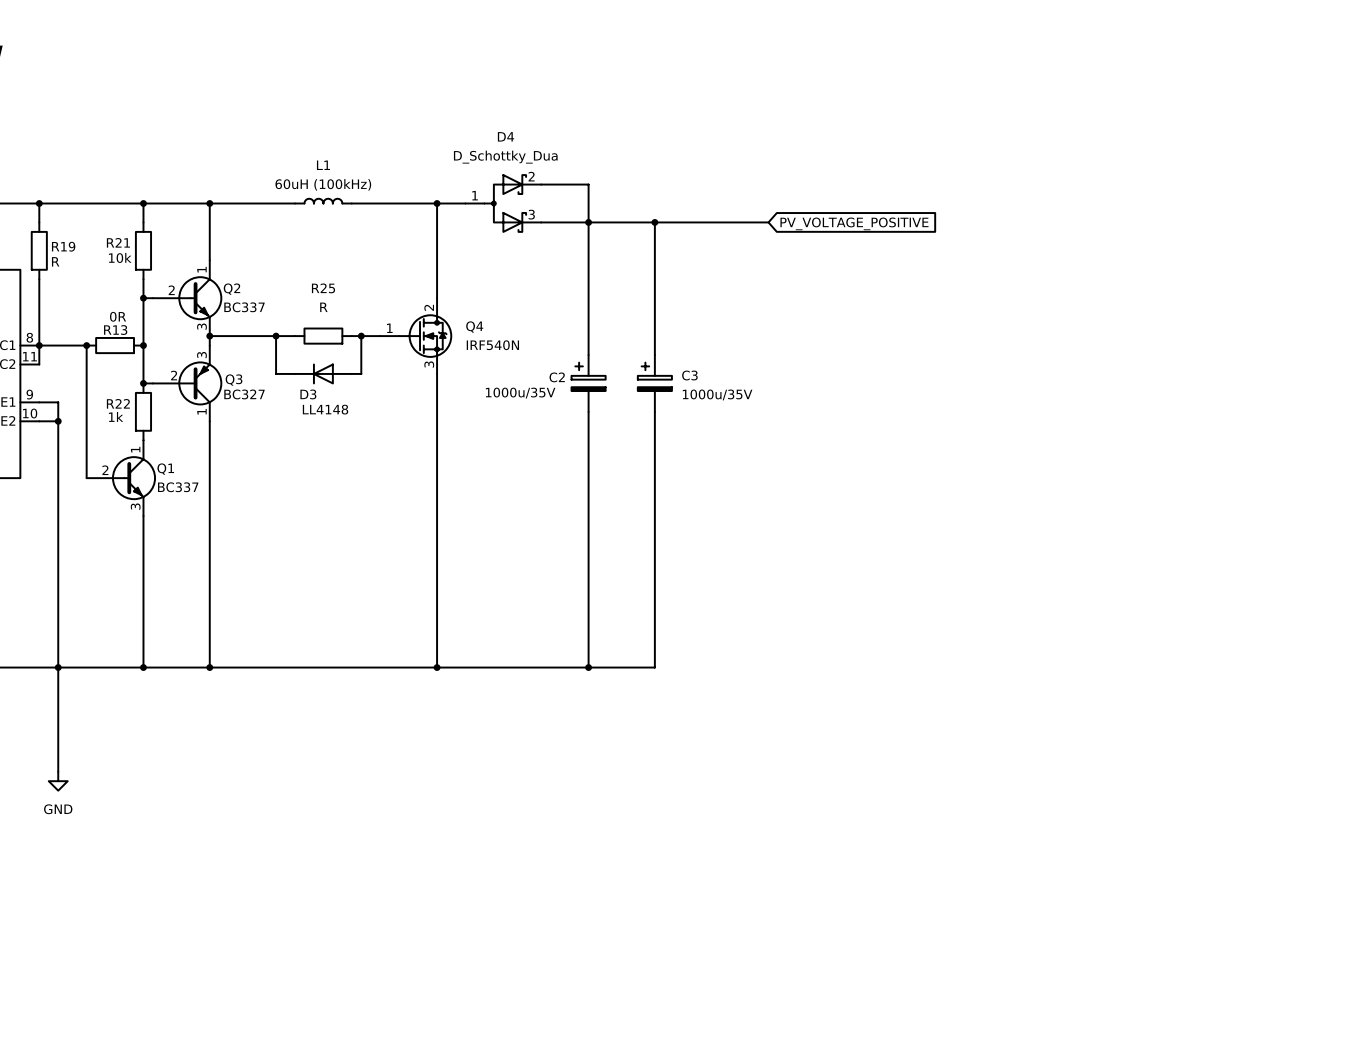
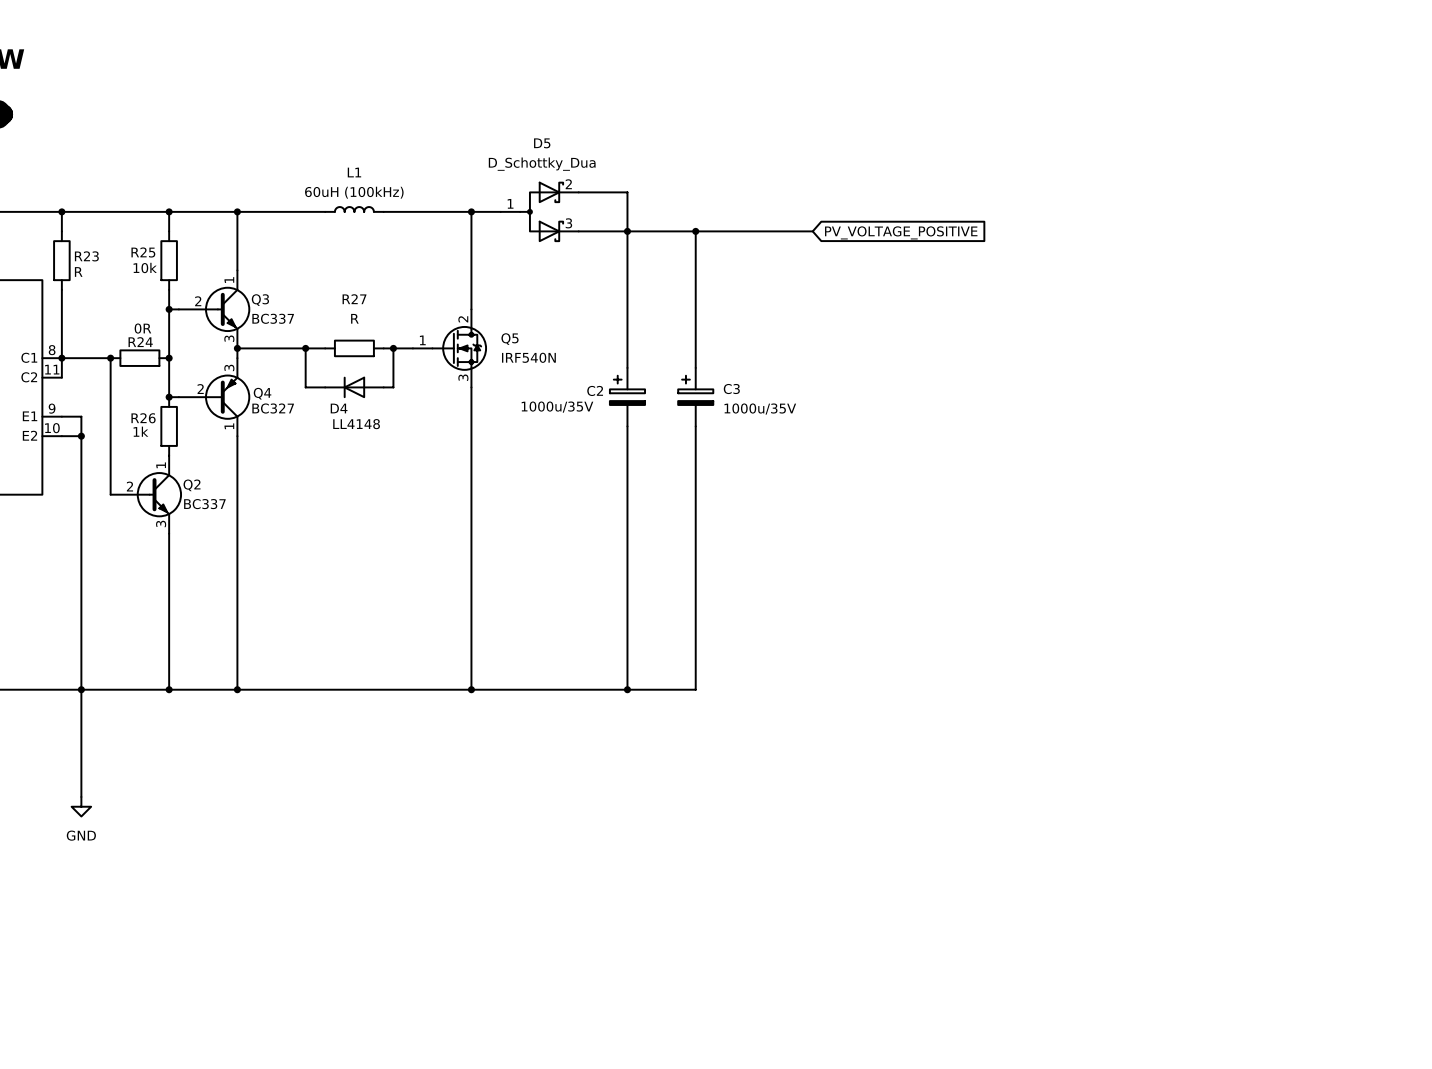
D4 name: D4 (505, 136) -> D5 (542, 143)
R21 name: R21 (118, 242) -> R25 (143, 252)
R19 name: R19 (63, 246) -> R23 (86, 256)
R25 name: R25 (323, 288) -> R27 (354, 299)
Q2 name: Q2 (231, 289) -> Q3 (260, 300)
Q4 name: Q4 (474, 327) -> Q5 (510, 339)
R13 name: R13 (115, 330) -> R24 (140, 342)
Q3 name: Q3 (234, 380) -> Q4 (262, 393)
D3 name: D3 (308, 394) -> D4 (339, 408)
R22 name: R22 (118, 403) -> R26 (143, 418)
Q1 name: Q1 (165, 469) -> Q2 (192, 485)

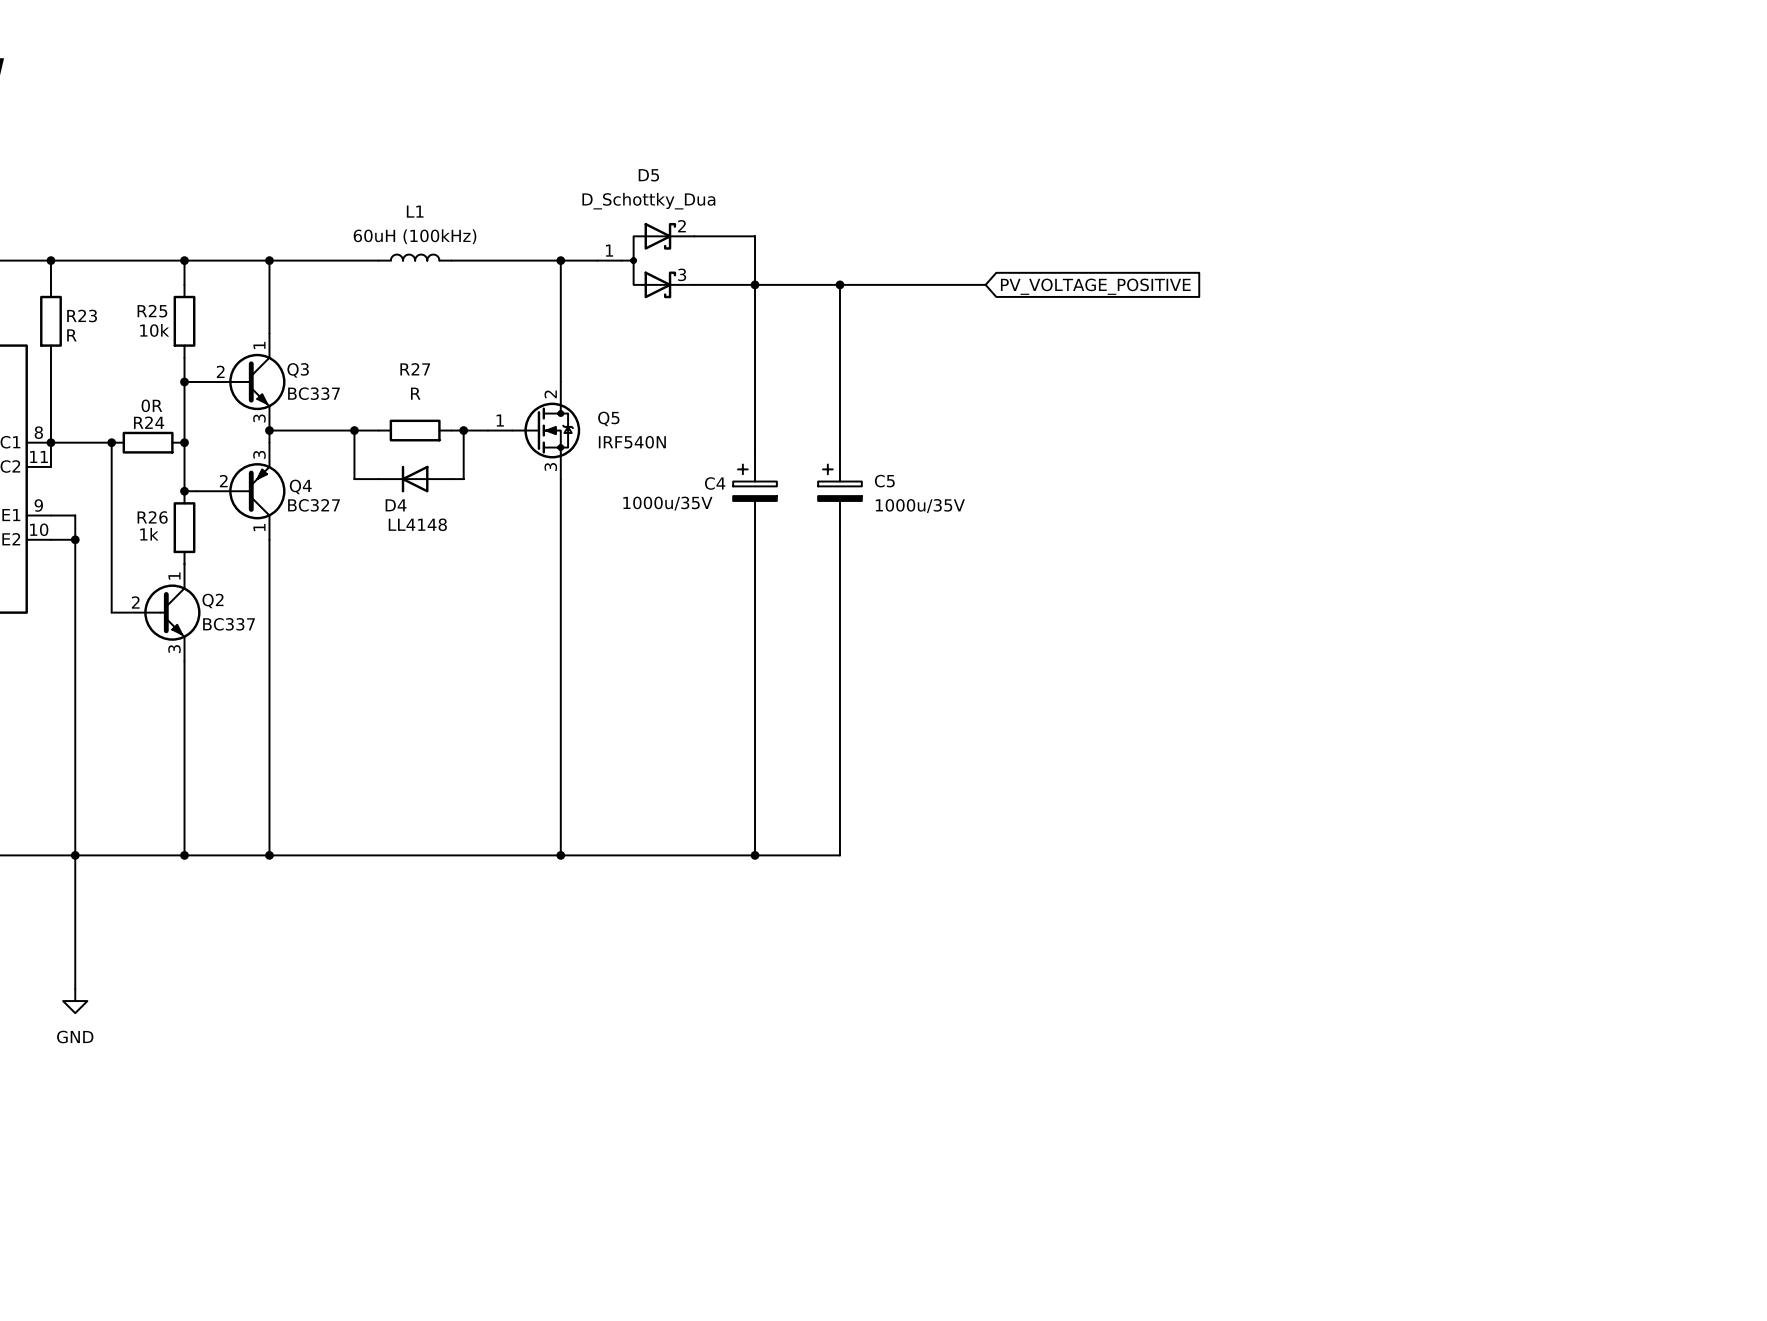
C3 name: C3 (731, 389) -> C5 (884, 481)
C2 name: C2 (595, 390) -> C4 (715, 483)

